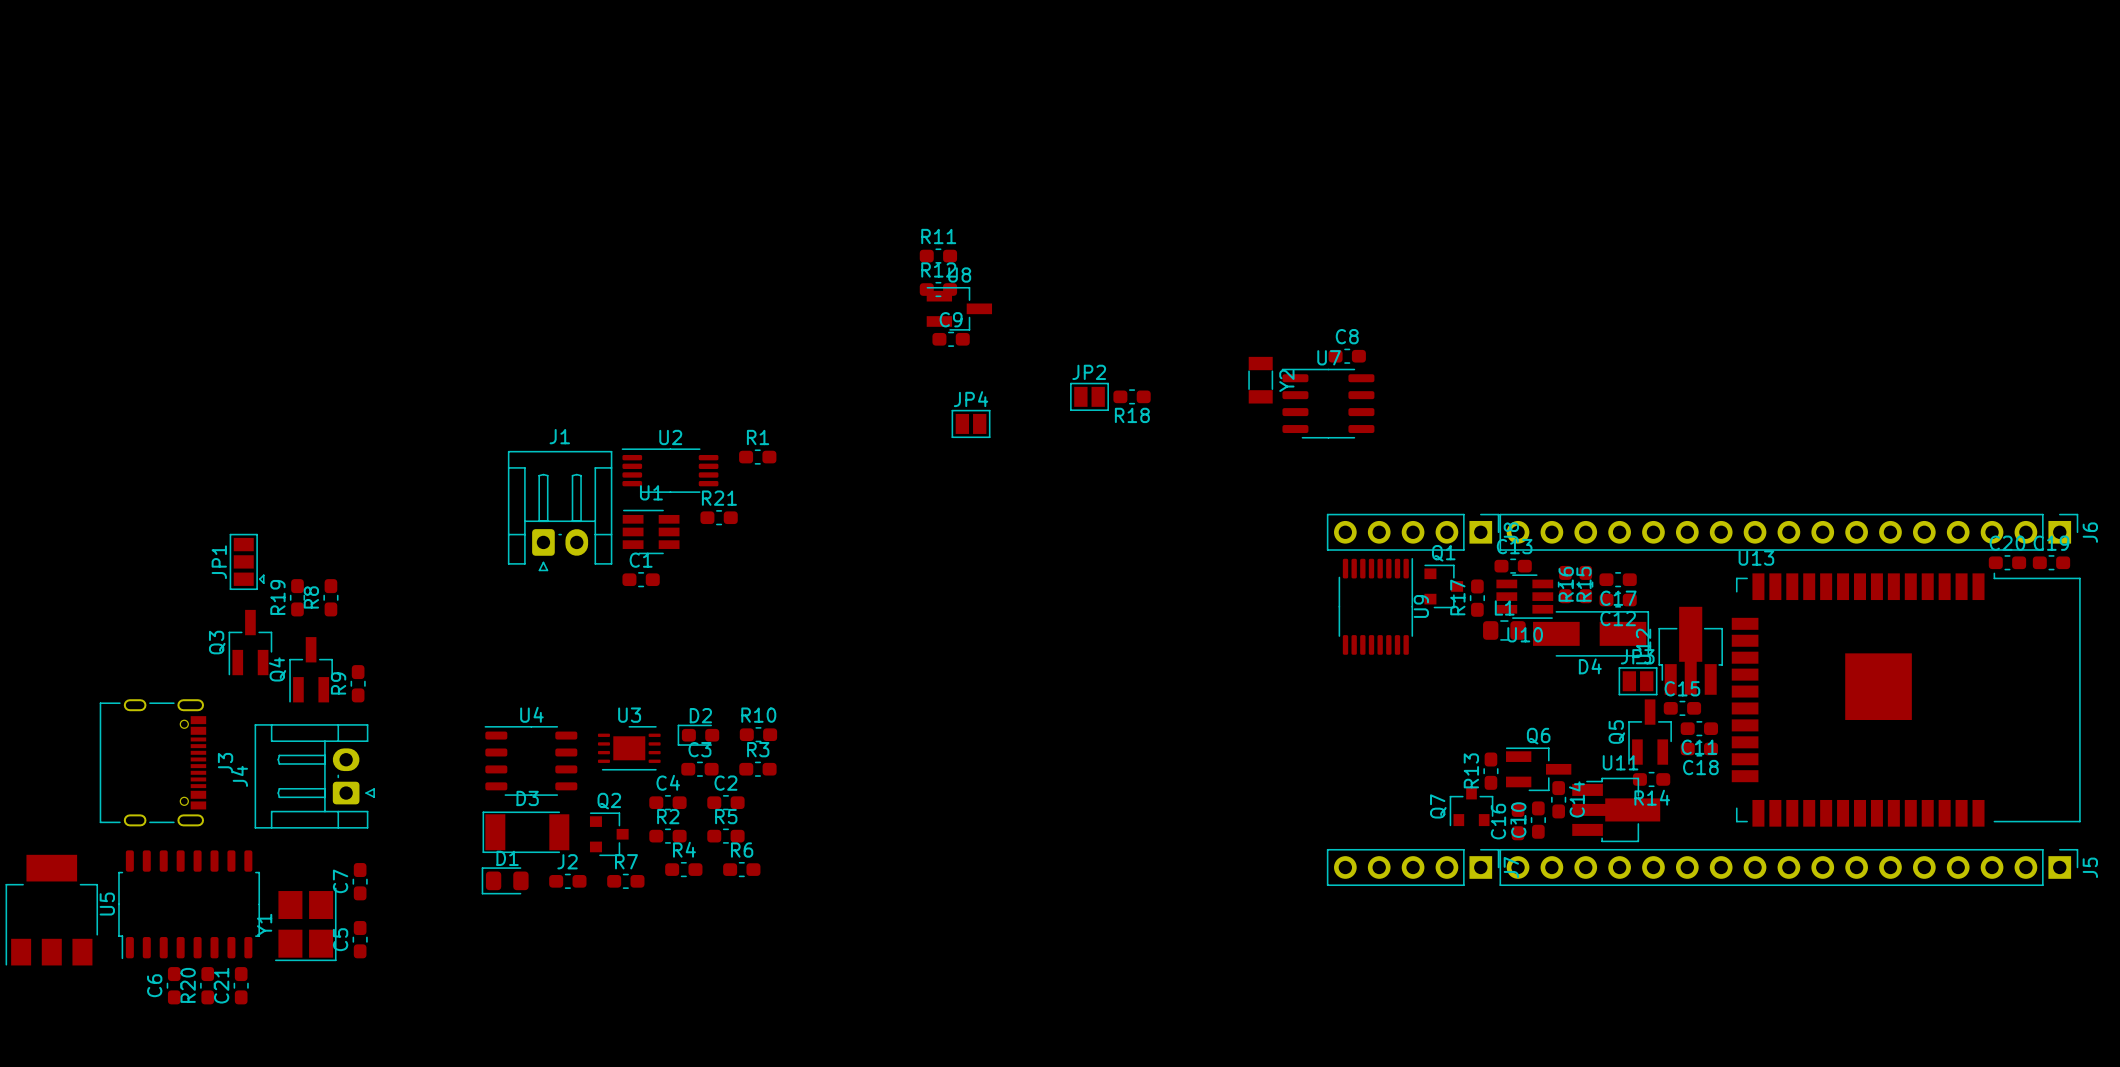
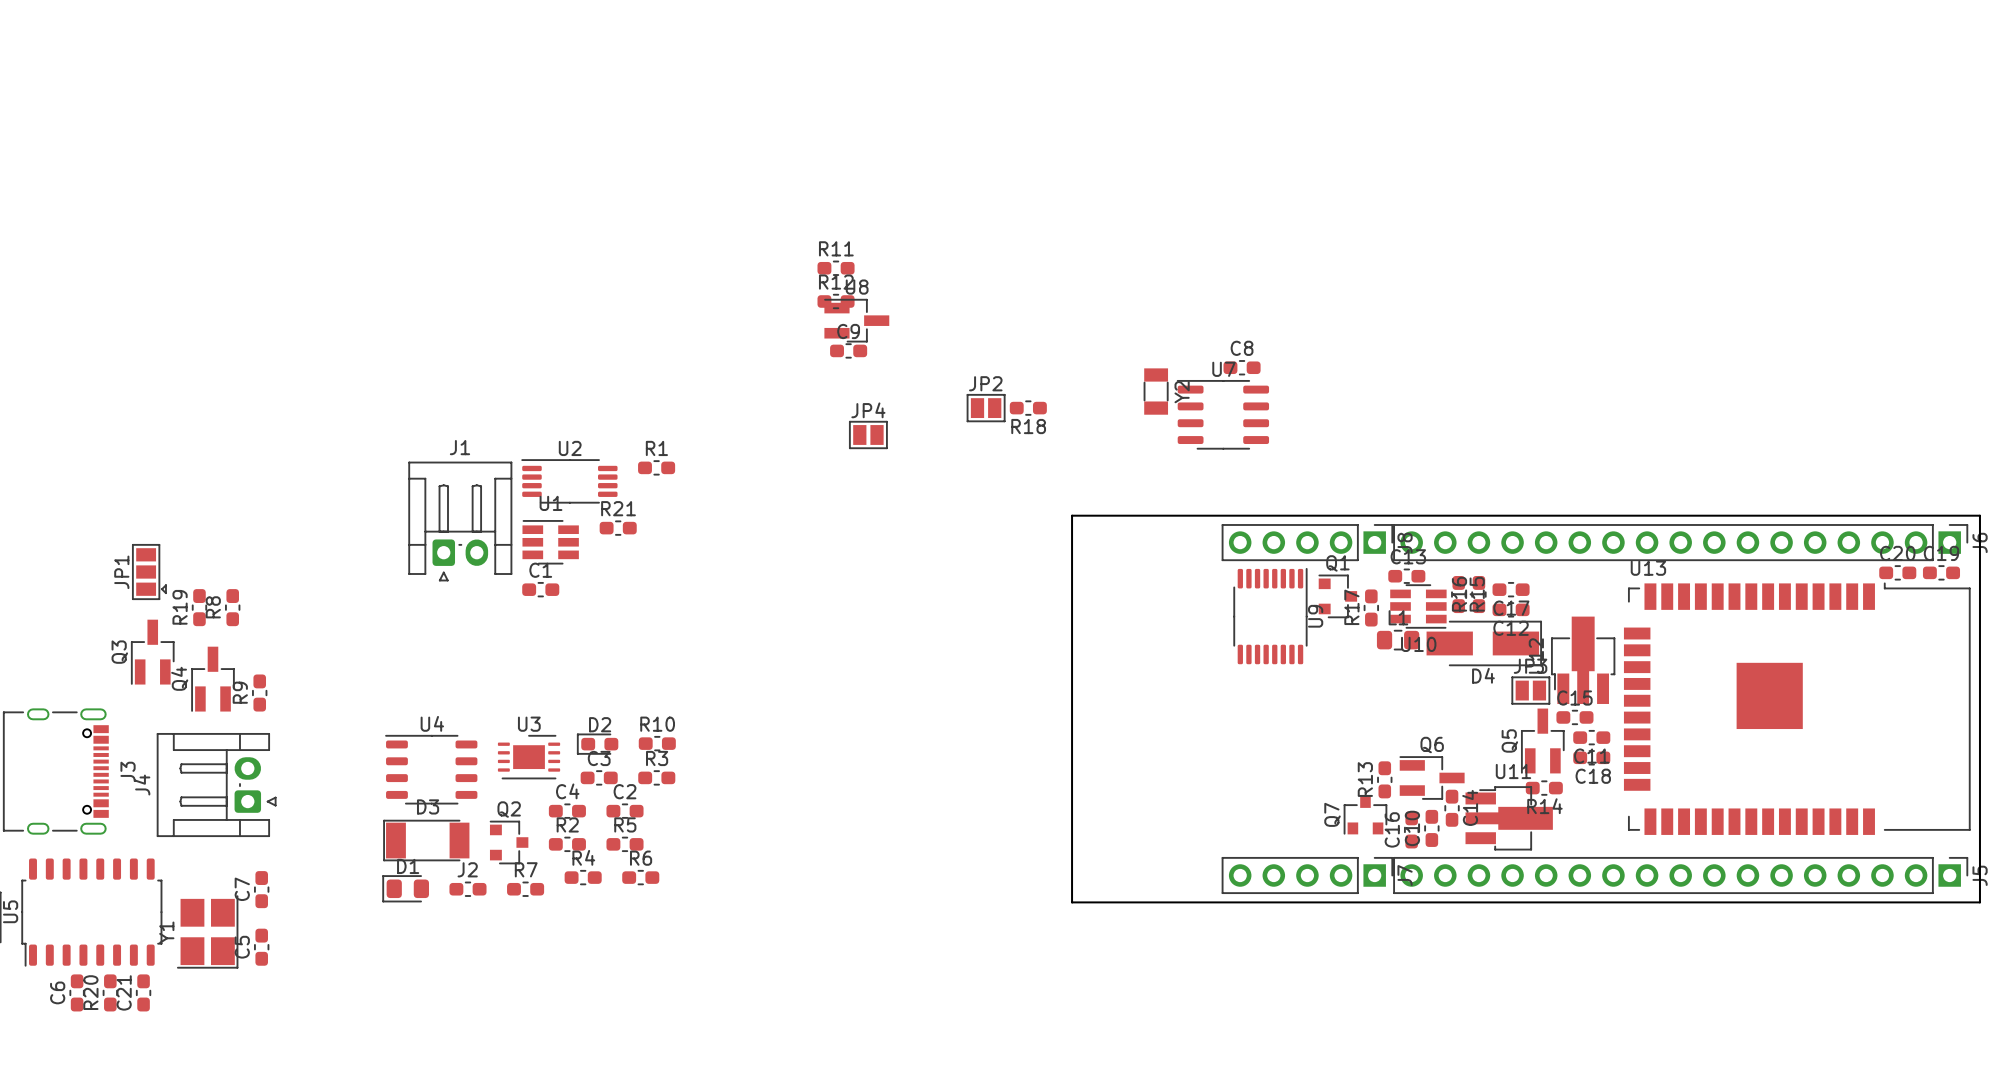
board edge: none -> (1072, 515) (1072, 902) (1979, 902) (1979, 515) (1072, 515)

